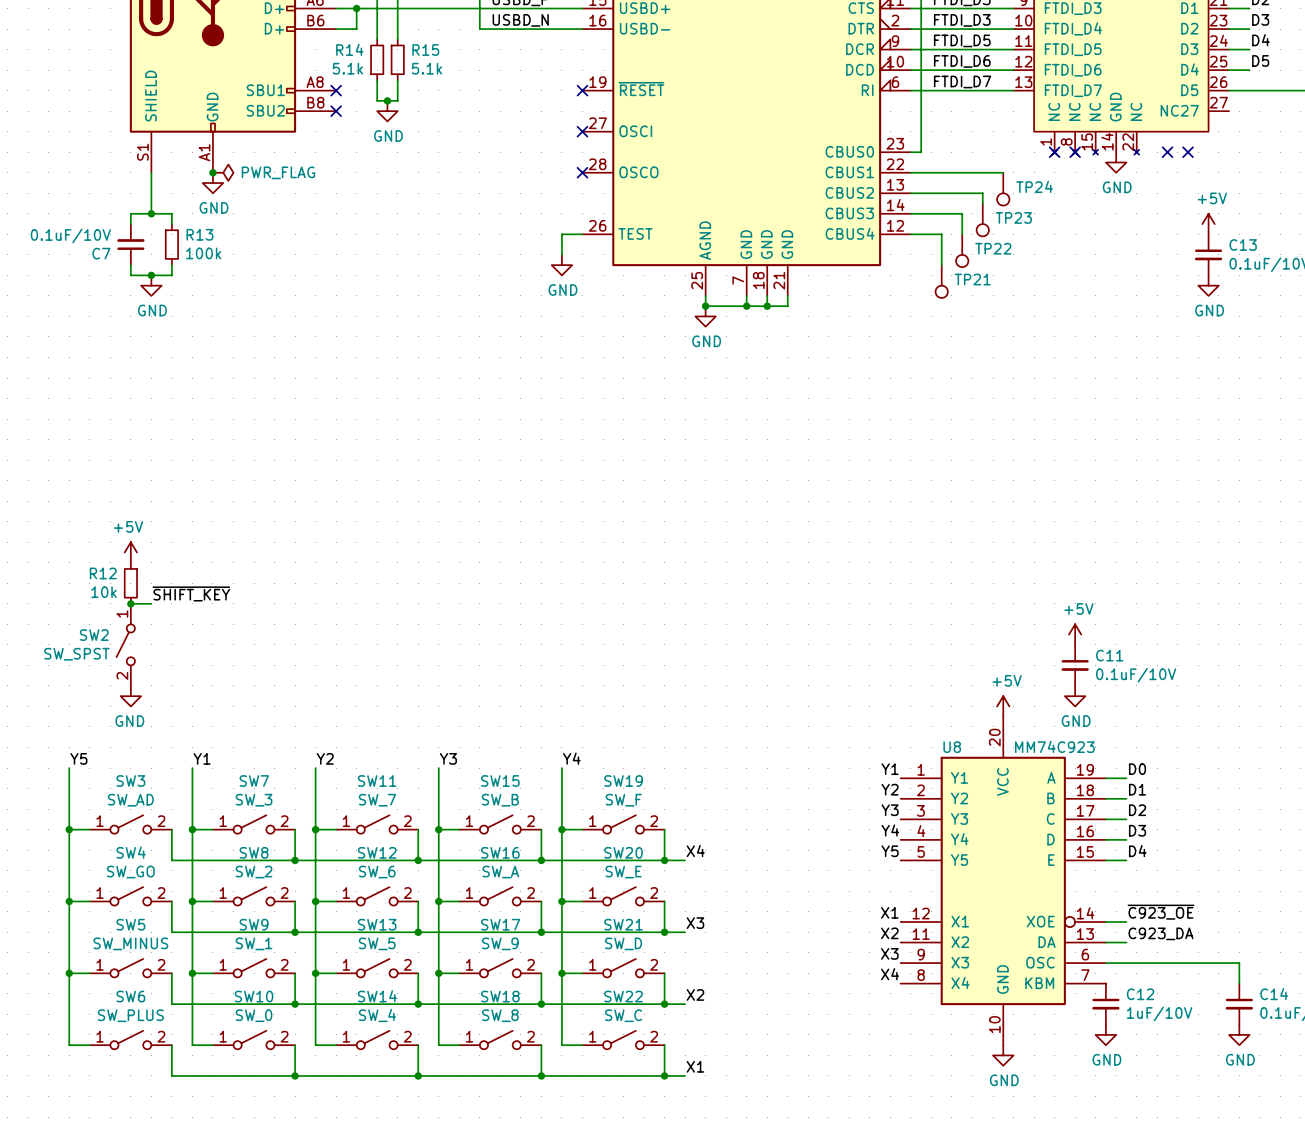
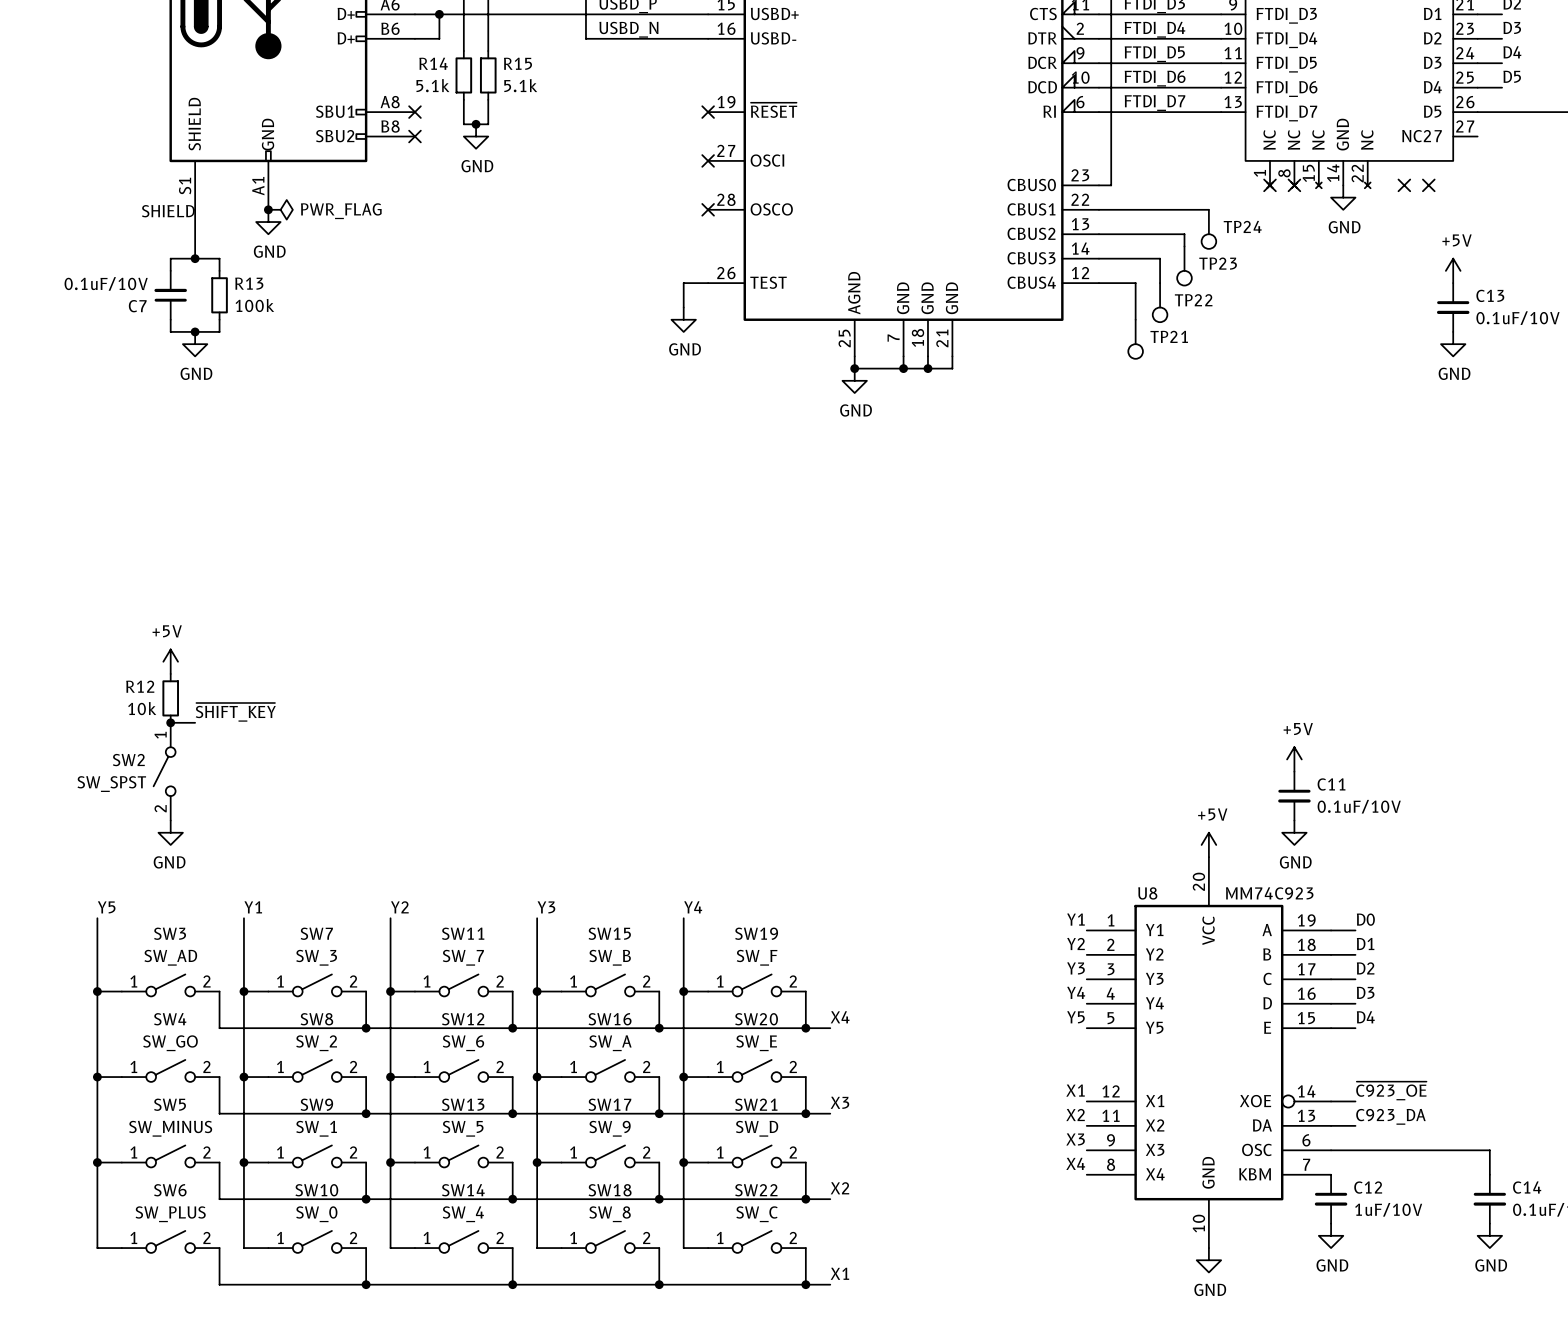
label: FTDI_D3 (962, 20) -> FTDI_D4 (1155, 29)
label: none -> SHIELD (168, 211)

